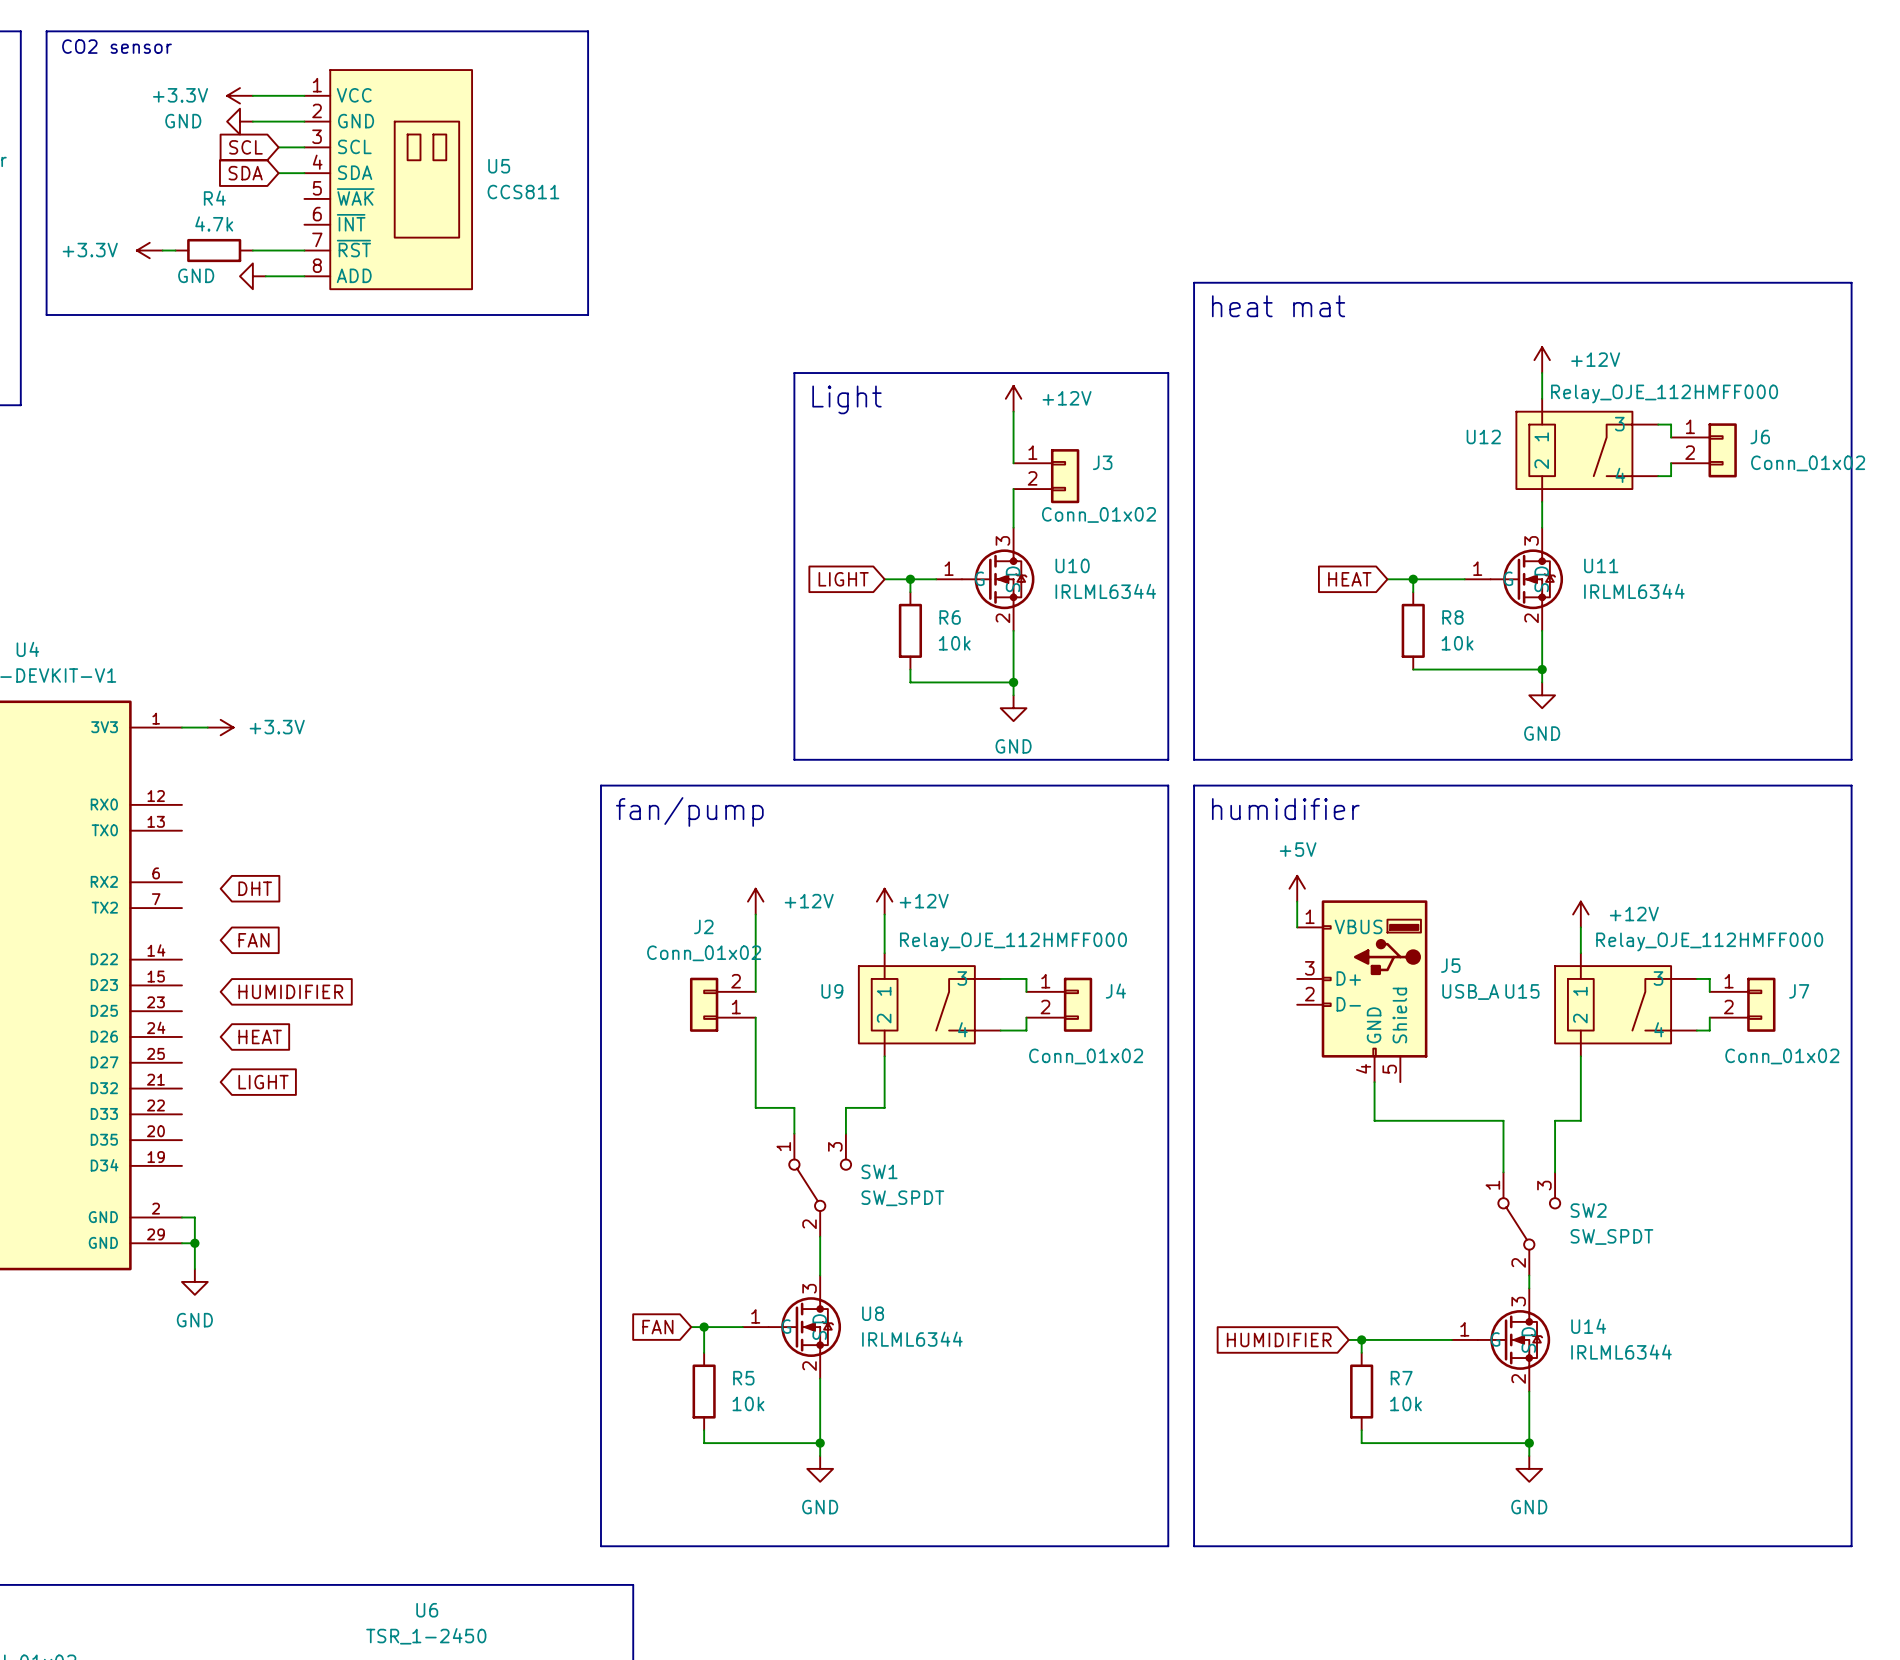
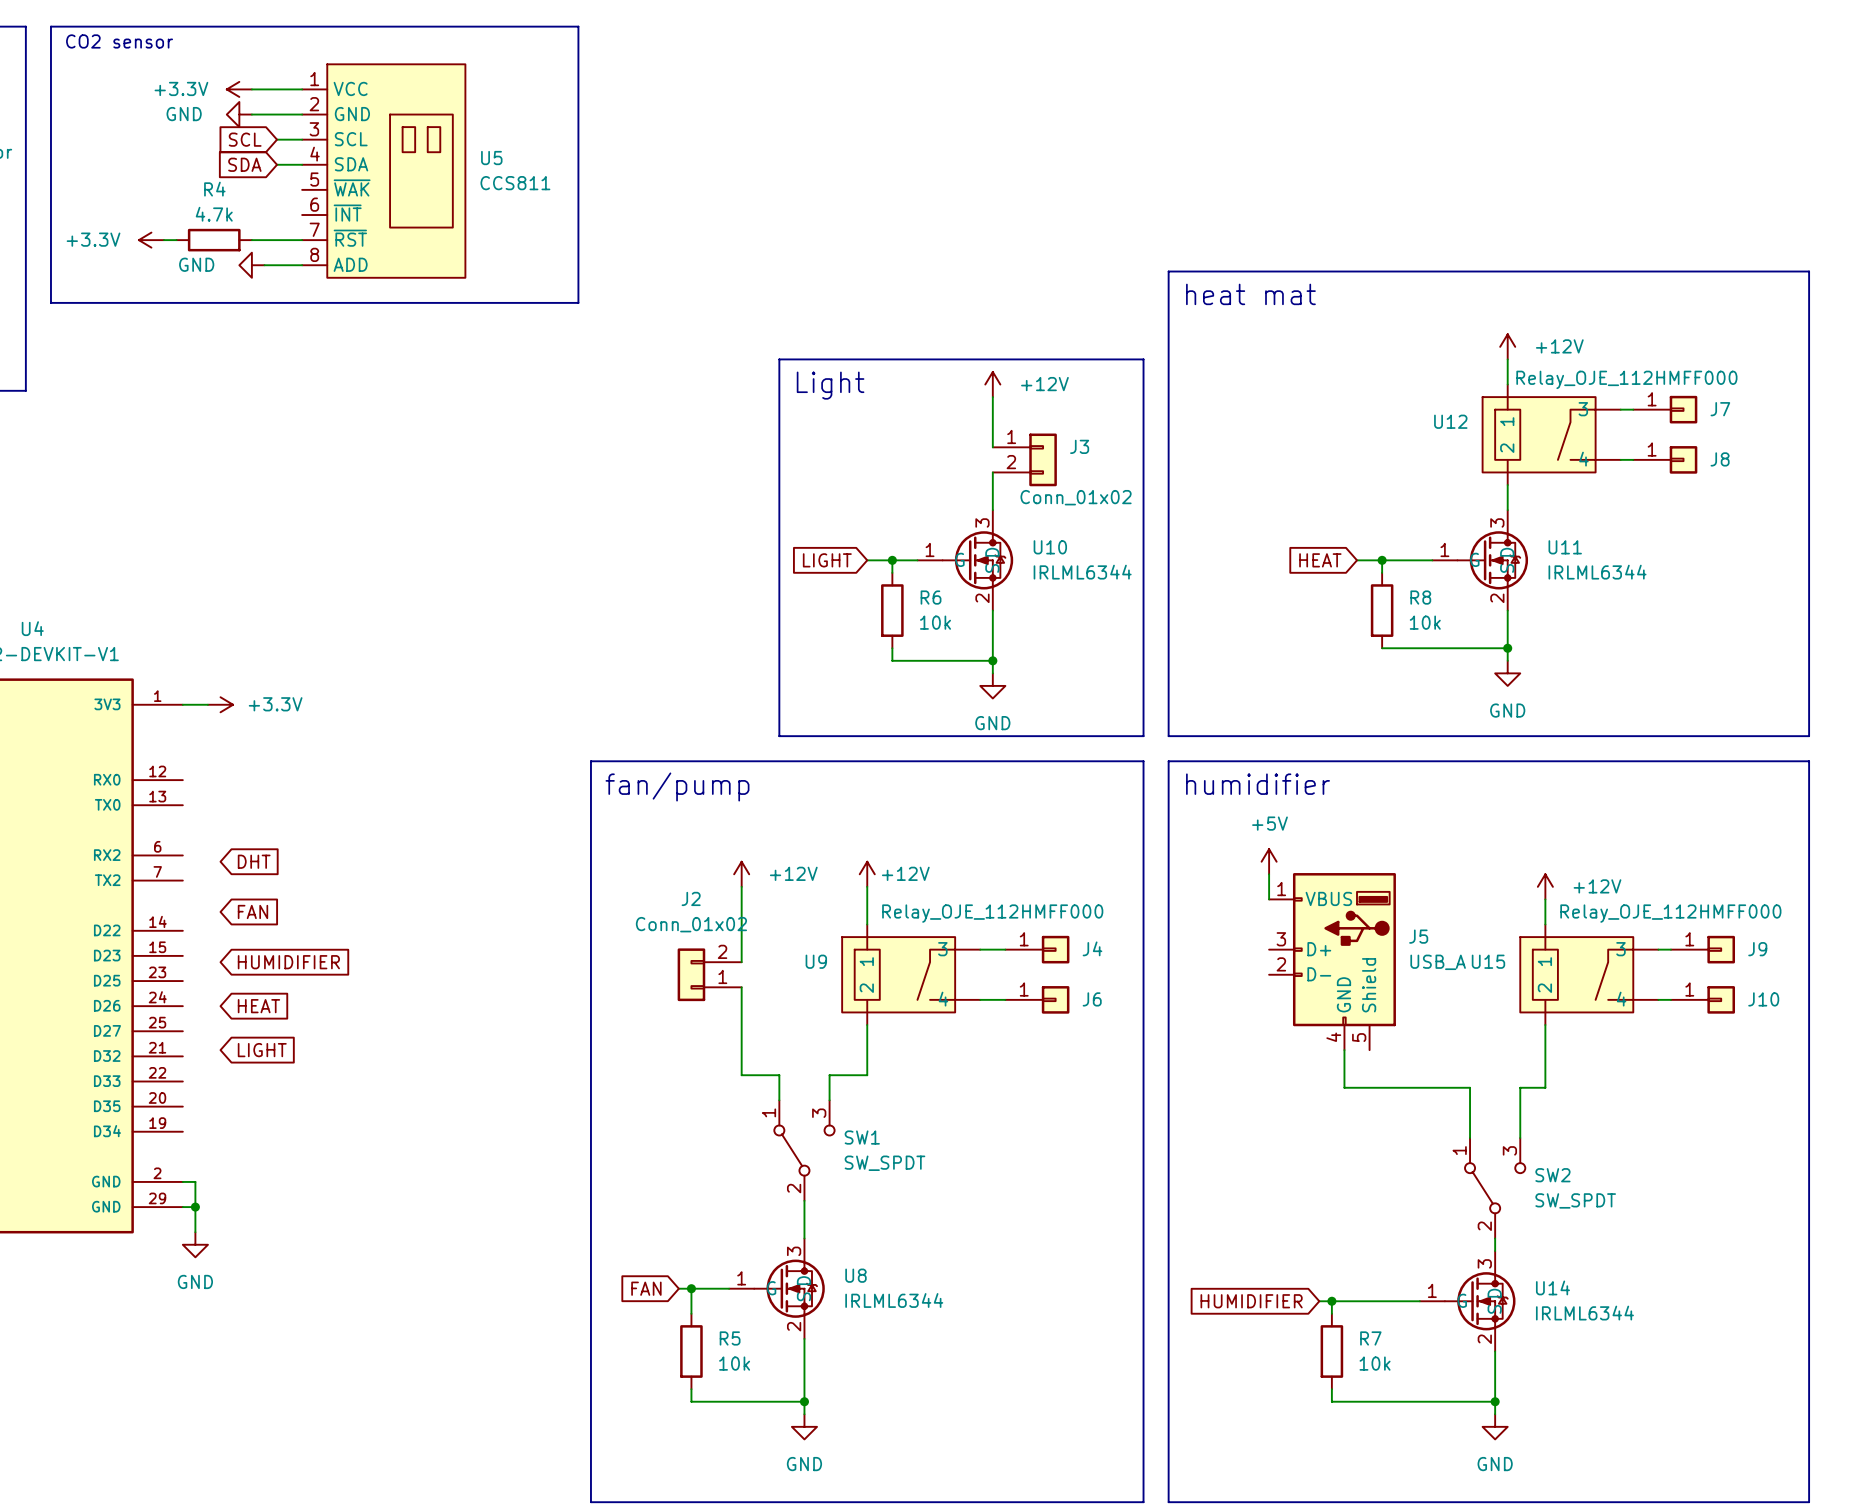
J6 symbol: [1671, 423, 1737, 478] -> [1005, 986, 1070, 1014]
wire: (1671, 424) (1671, 437) -> none
wire: (1671, 463) (1671, 476) -> none
J6 value: Conn_01x02 (1808, 463) -> none
J8: none -> (1665, 459)
J4 symbol: [1026, 977, 1093, 1032] -> [1005, 935, 1070, 964]
J7 symbol: [1709, 977, 1776, 1032] -> [1633, 395, 1698, 424]
wire: (1026, 978) (1026, 991) -> none
wire: (1709, 978) (1709, 991) -> none
J9: none -> (1702, 949)
wire: (1026, 1017) (1026, 1030) -> none
wire: (1709, 1017) (1709, 1030) -> none
J10: none -> (1702, 999)
J4 value: Conn_01x02 (1086, 1056) -> none
J7 value: Conn_01x02 (1782, 1056) -> none

